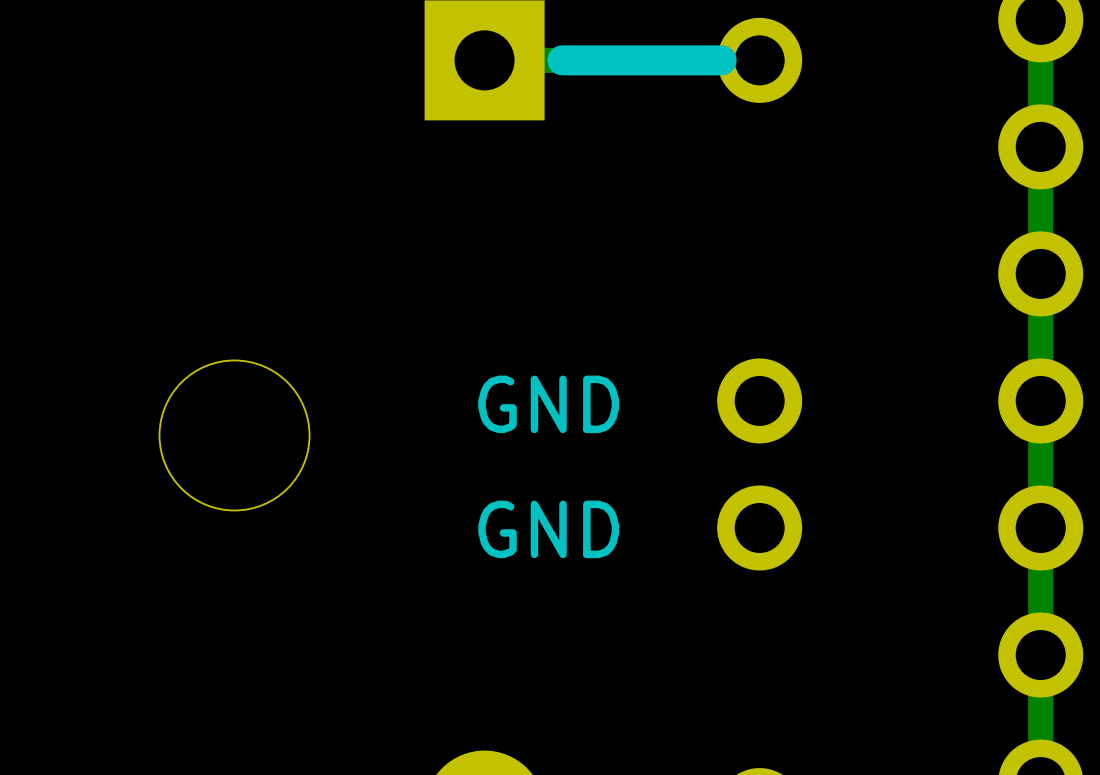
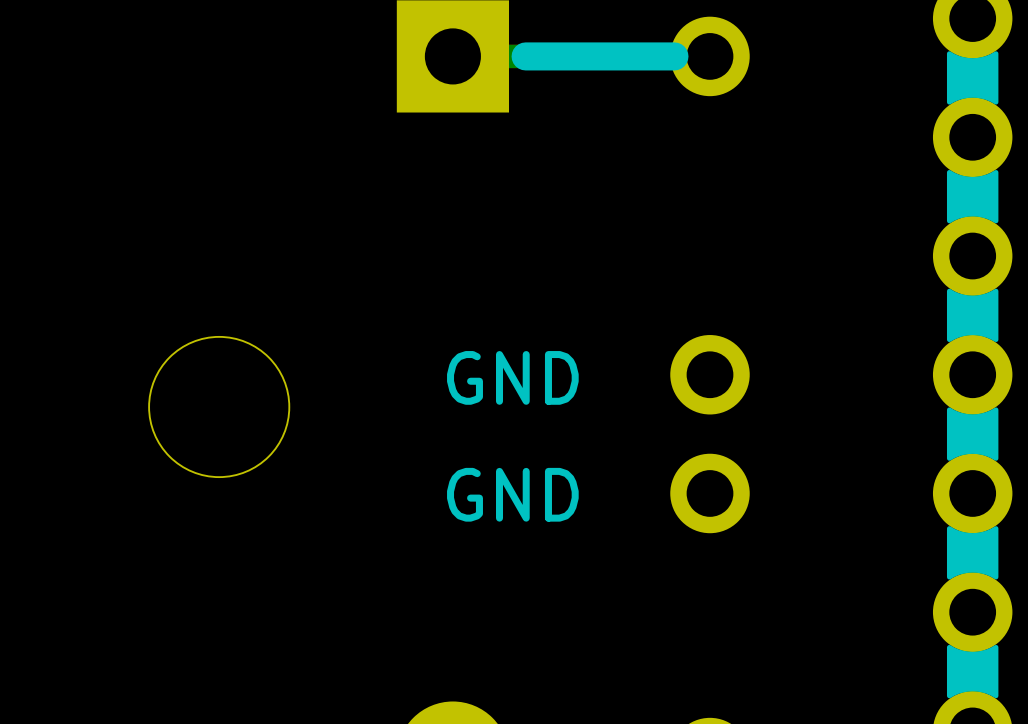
drawing: none -> [946, 51, 999, 105]
drawing: none -> [946, 170, 999, 224]
drawing: none -> [946, 288, 999, 343]
drawing: none -> [946, 407, 999, 461]
drawing: none -> [946, 526, 999, 580]
drawing: none -> [946, 644, 999, 699]

